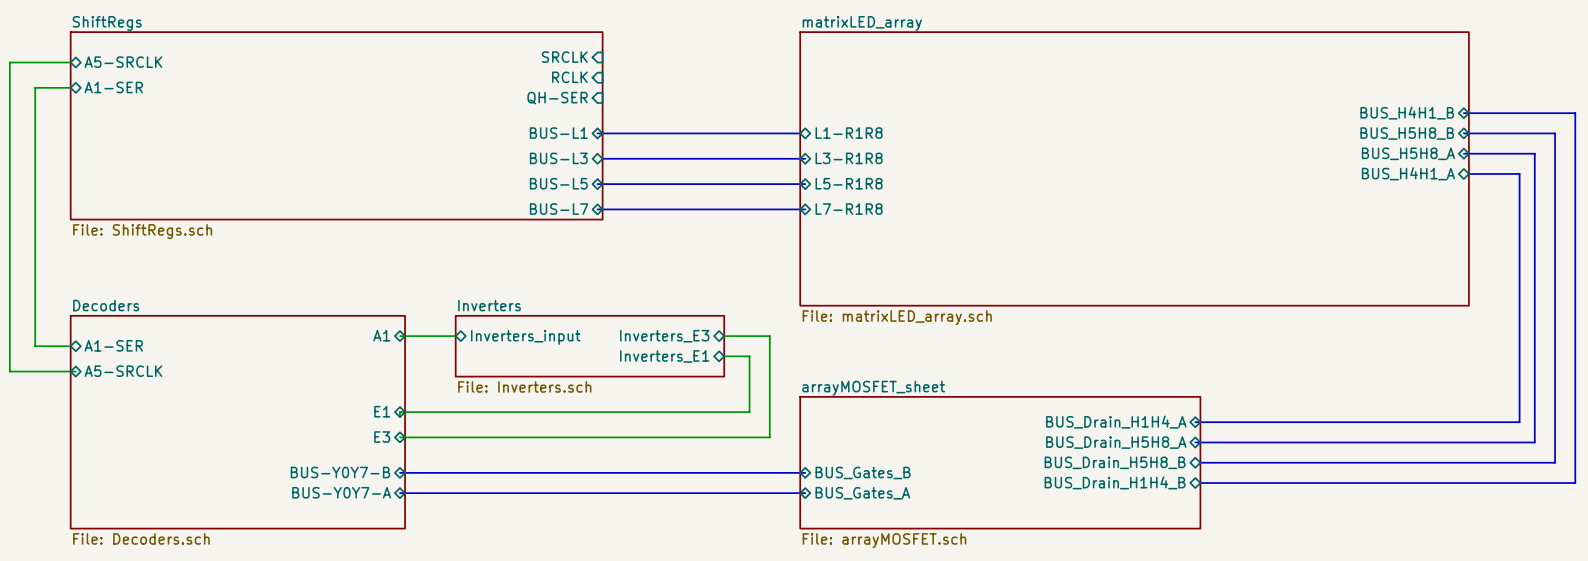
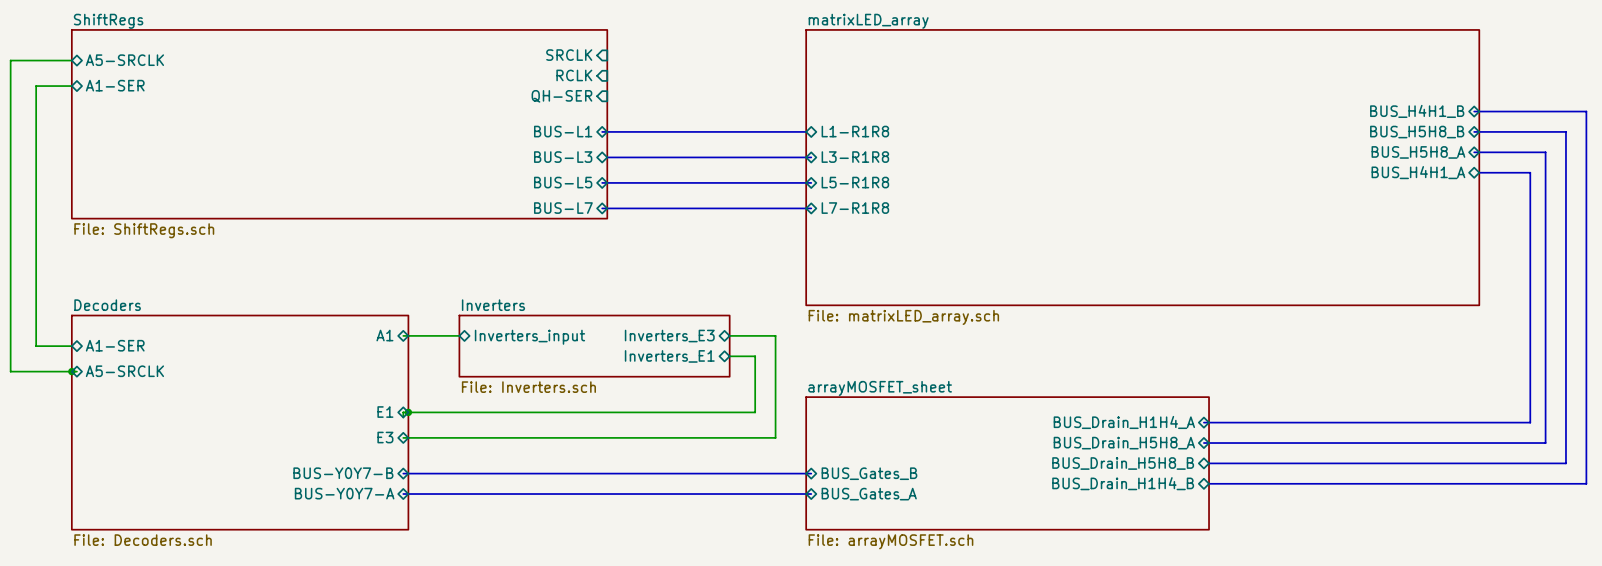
junction: none -> (71, 371)
junction: none -> (408, 412)

